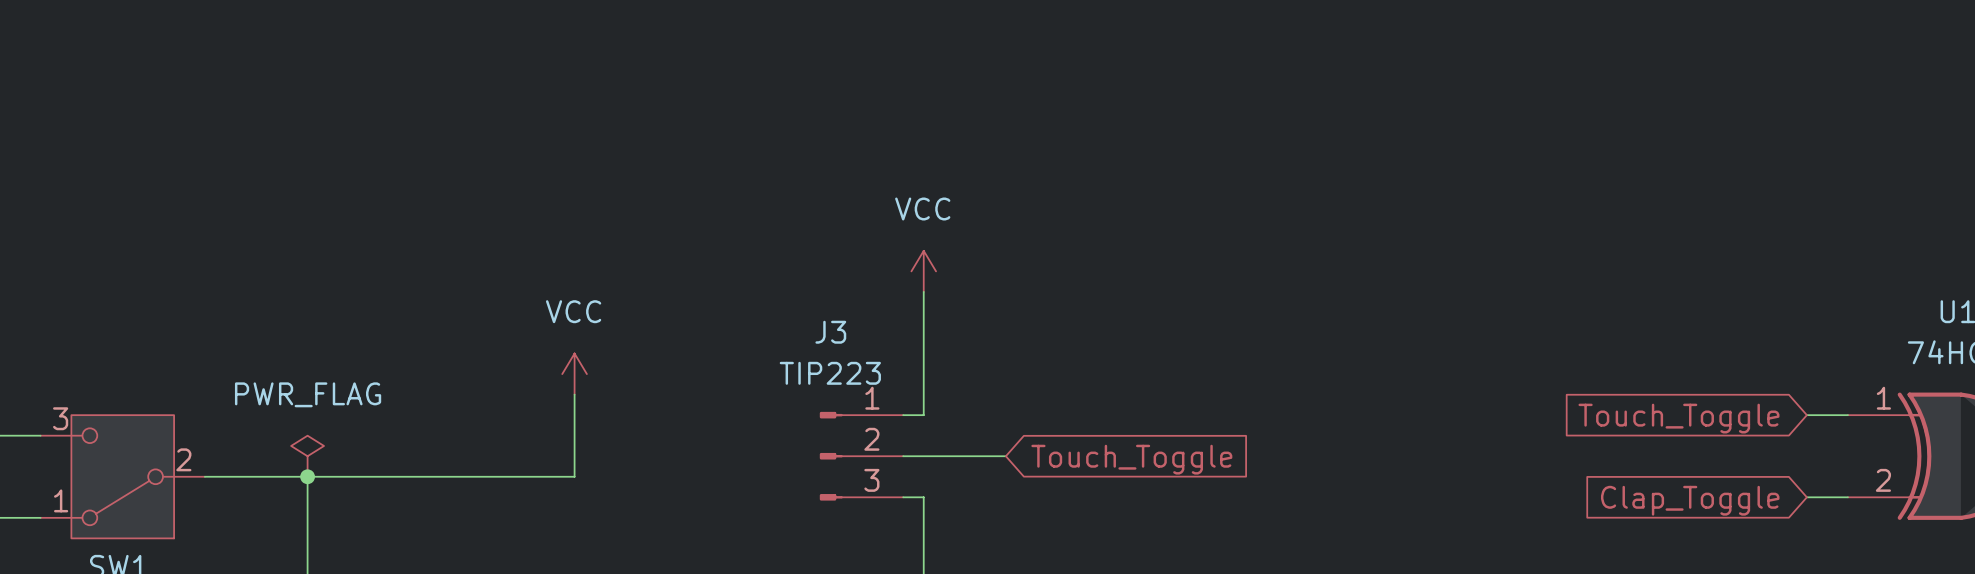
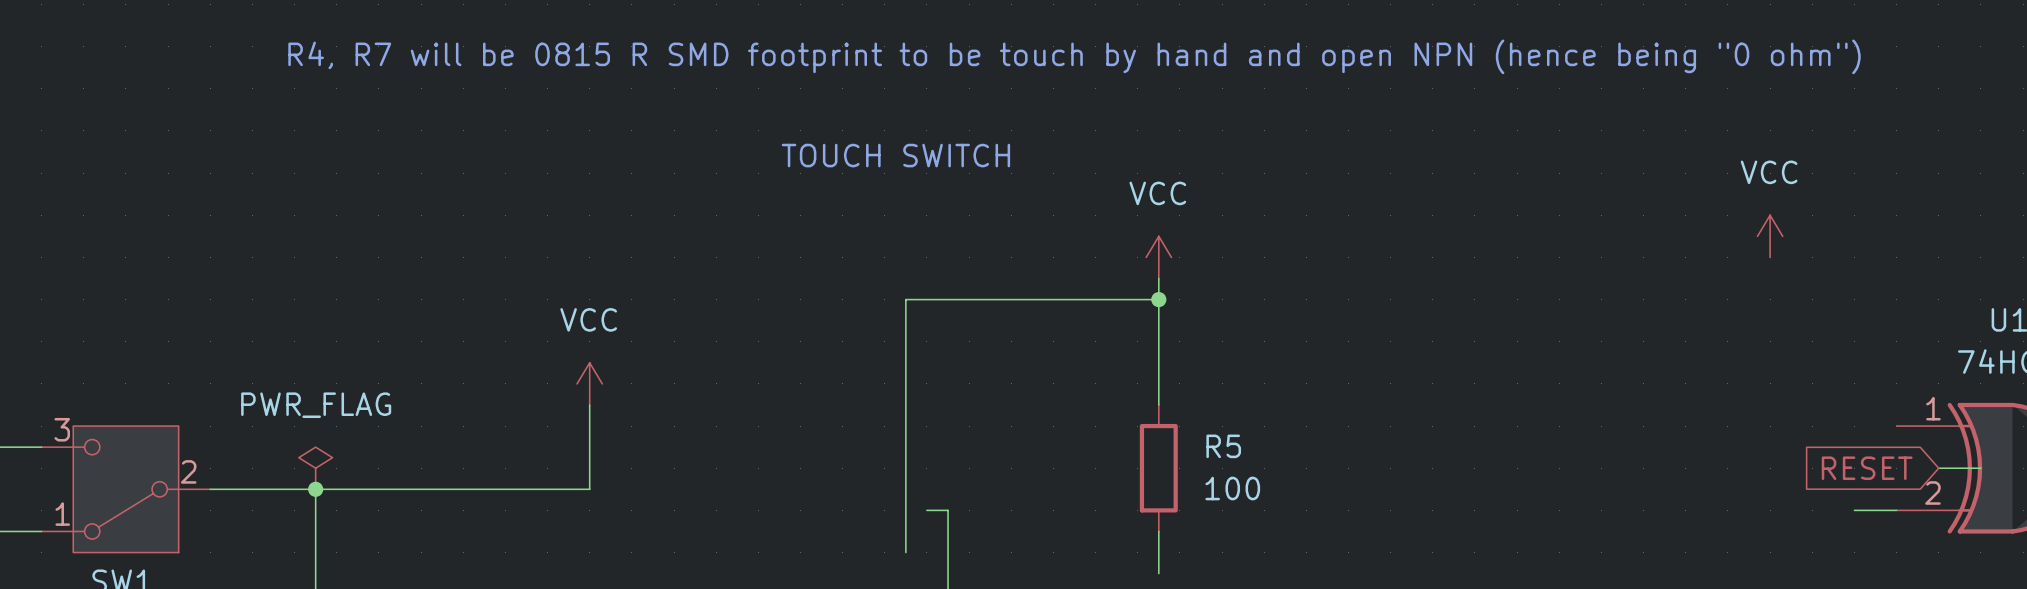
text: none -> R4, R7 will be 0815 R SMD footprint to be touch by hand and open NPN (hence being "0 ohm") (1074, 56)
text: none -> TOUCH SWITCH (895, 155)
power symbol: none -> VCC (1770, 236)
power symbol position: VCC (923, 271) -> VCC (1158, 257)
wire: none -> (1158, 278) (1158, 404)
wire: (923, 291) (923, 415) (903, 415) -> none
wire: none -> (1158, 299) (905, 299) (905, 552)
junction: none -> (1158, 299)
wire: (1806, 415) (1847, 415) -> (1938, 468) (1980, 468)
global label: Touch_Toggle (1678, 418) -> none
J3: TIP223 (861, 456) -> none
wire: (903, 456) (1005, 456) -> none
R5: none -> 100 (1158, 468)
global label: none -> RESET (1867, 468)
global label: Touch_Toggle (1131, 459) -> none
global label: Clap_Toggle (1690, 500) -> none
wire: none -> (1158, 531) (1158, 573)

